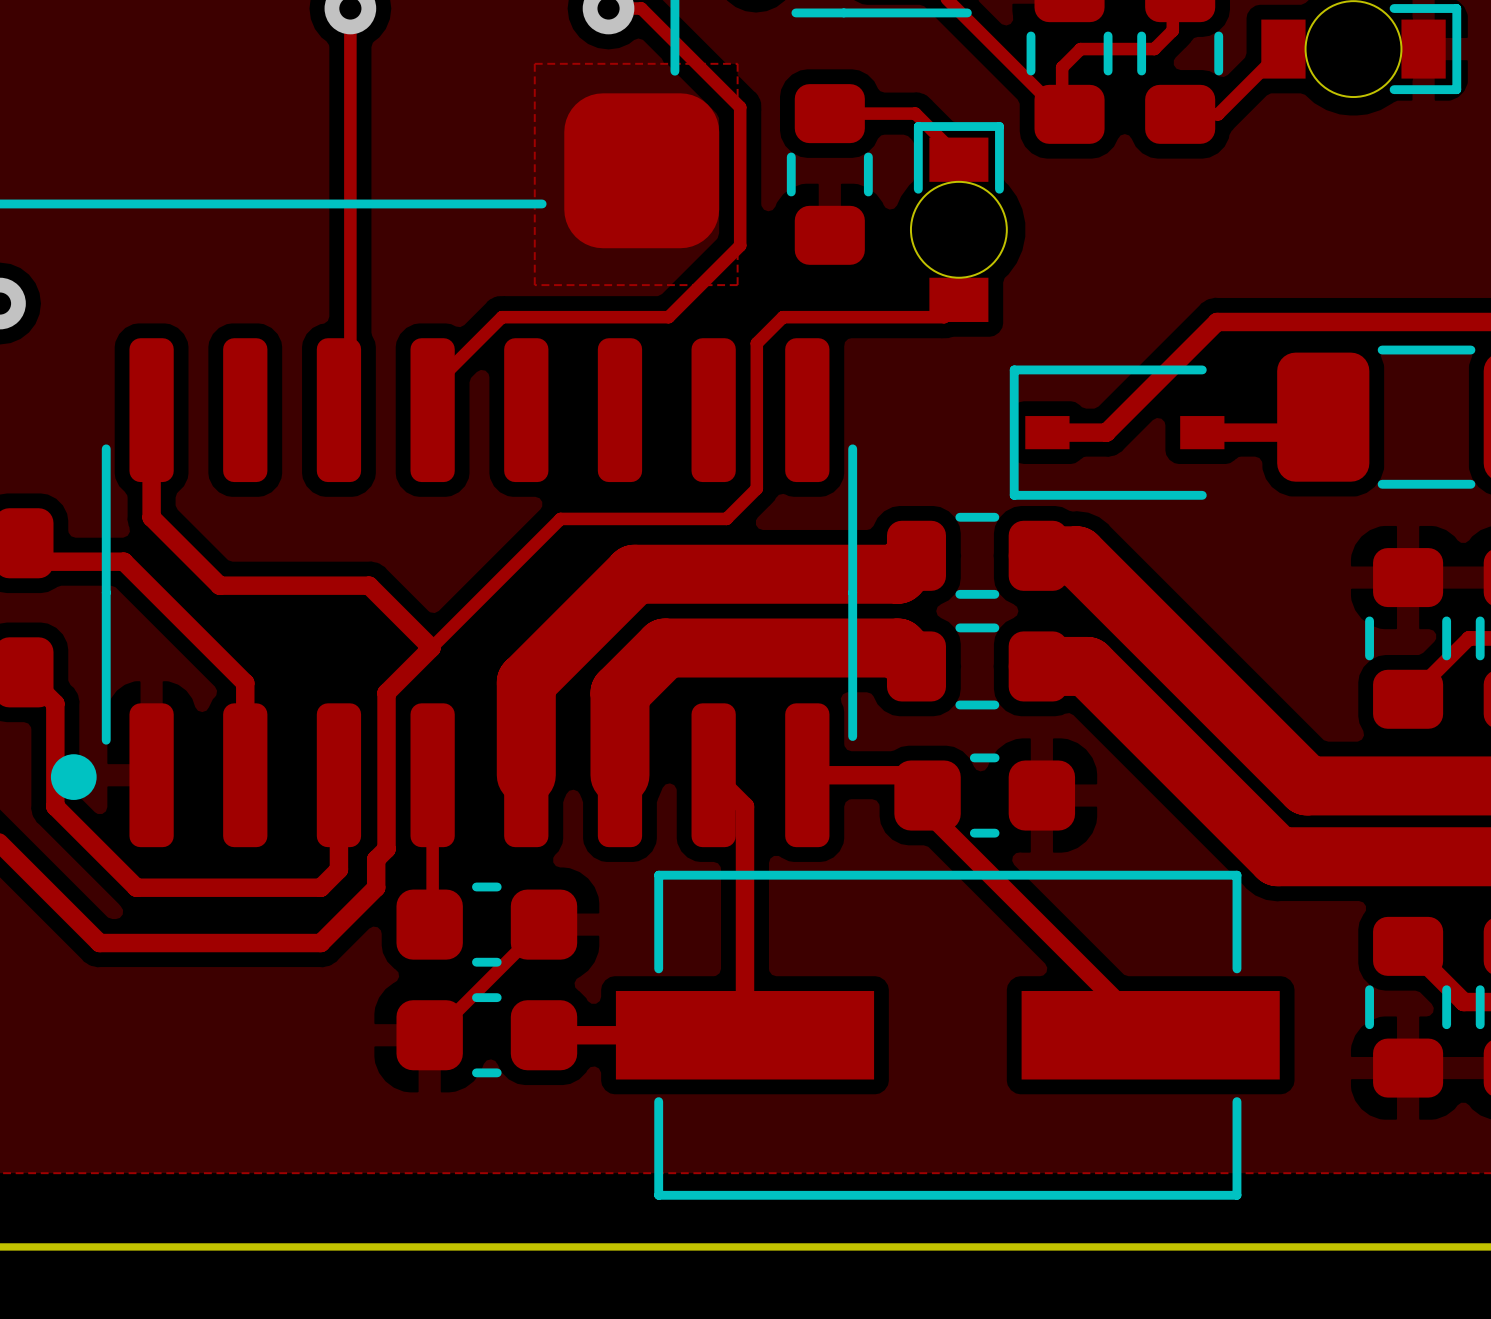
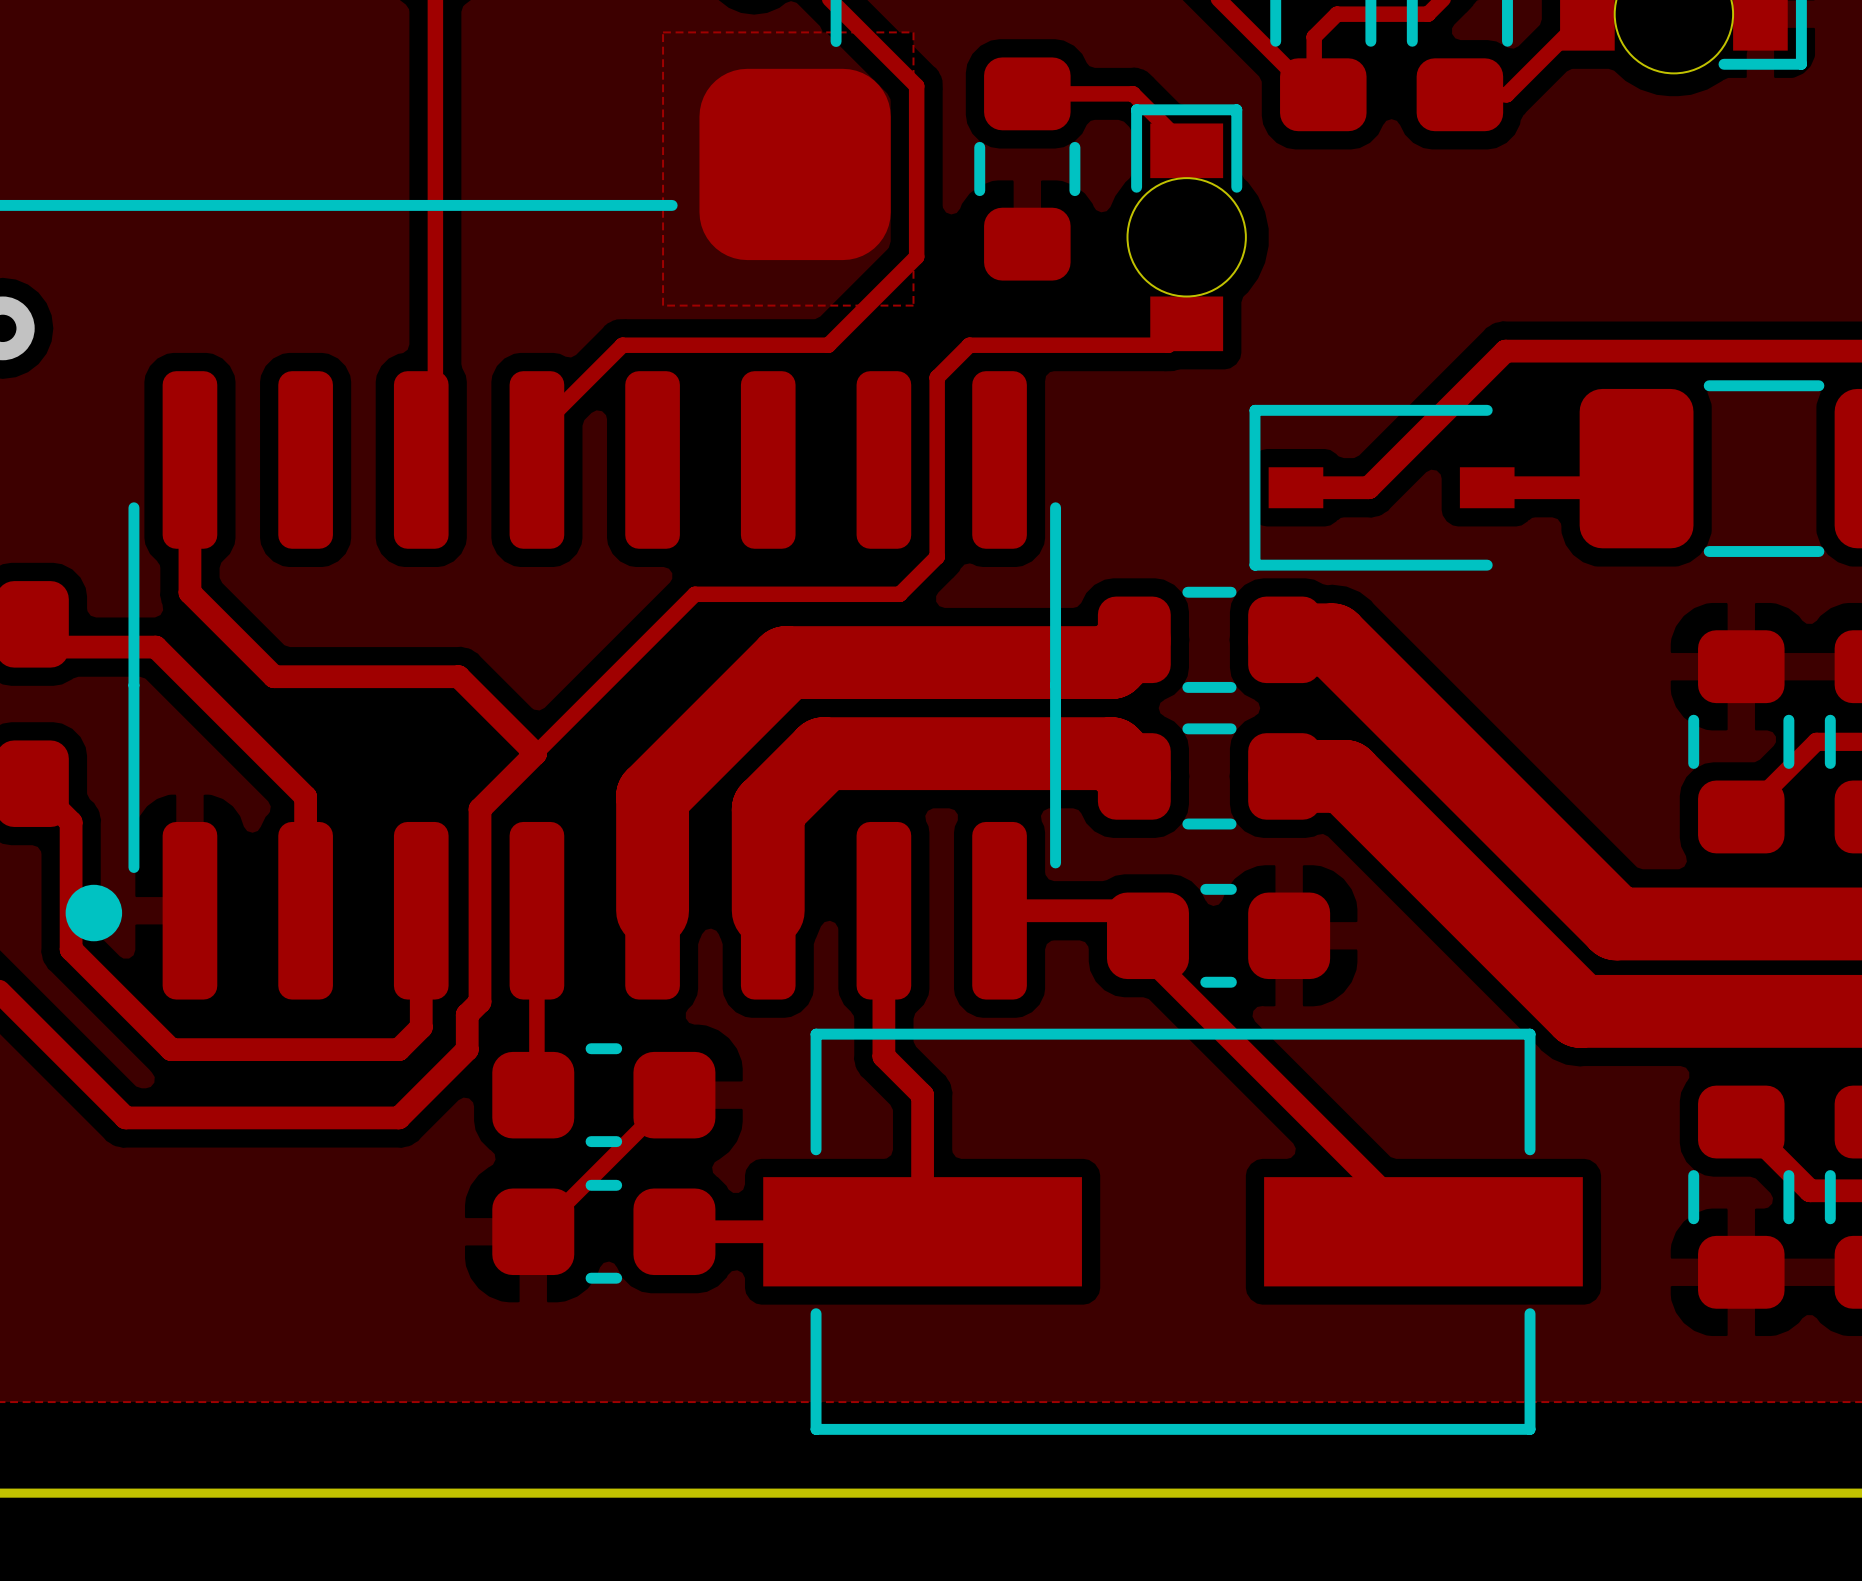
track: (713, 775) (744, 806) (744, 924) -> (883, 910) (883, 1056) (922, 1095)

